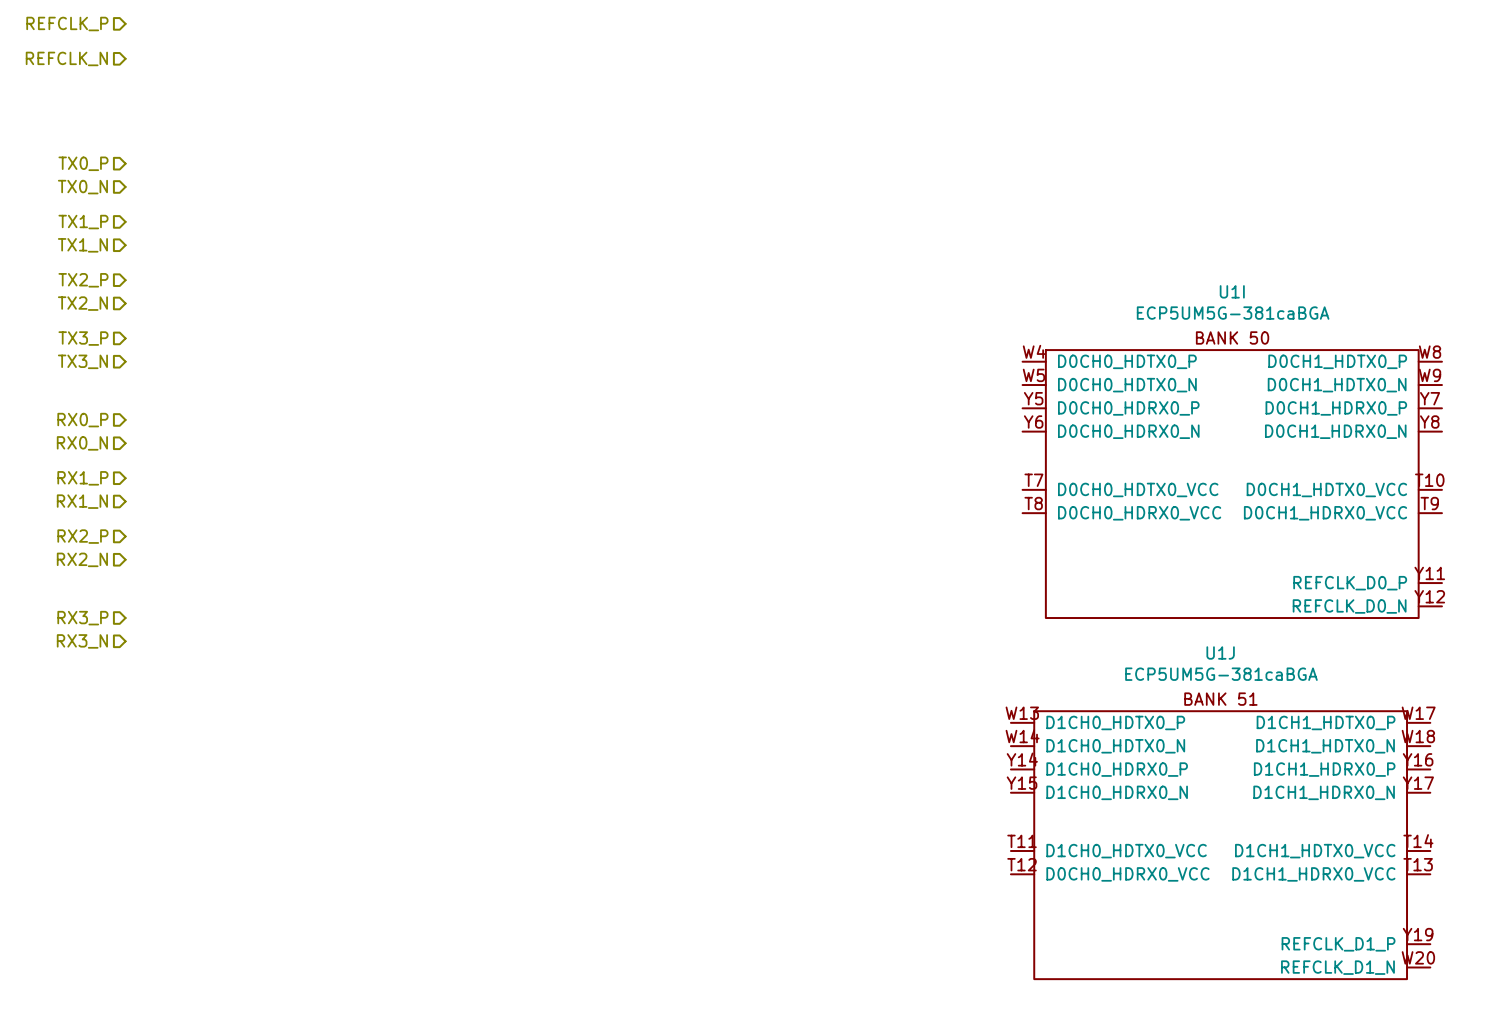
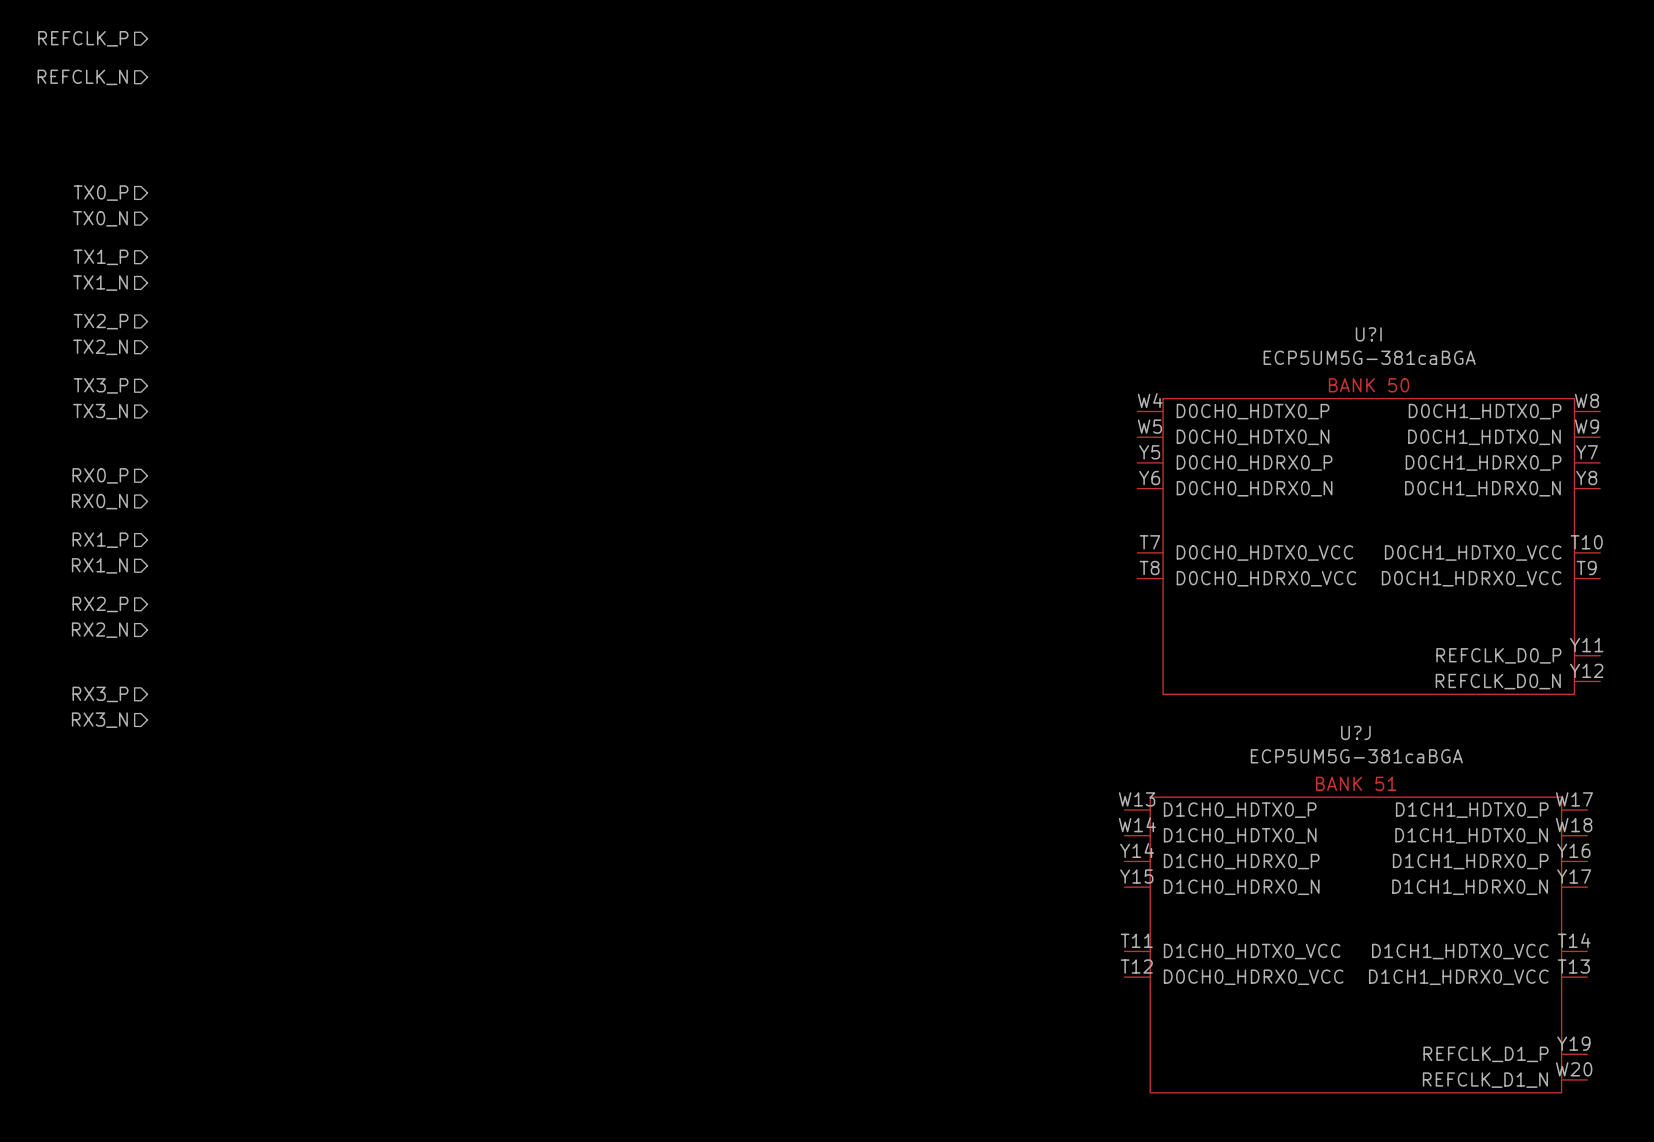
U1I name: U1I (1232, 291) -> U?I (1368, 334)
U1J name: U1J (1220, 652) -> U?J (1355, 732)

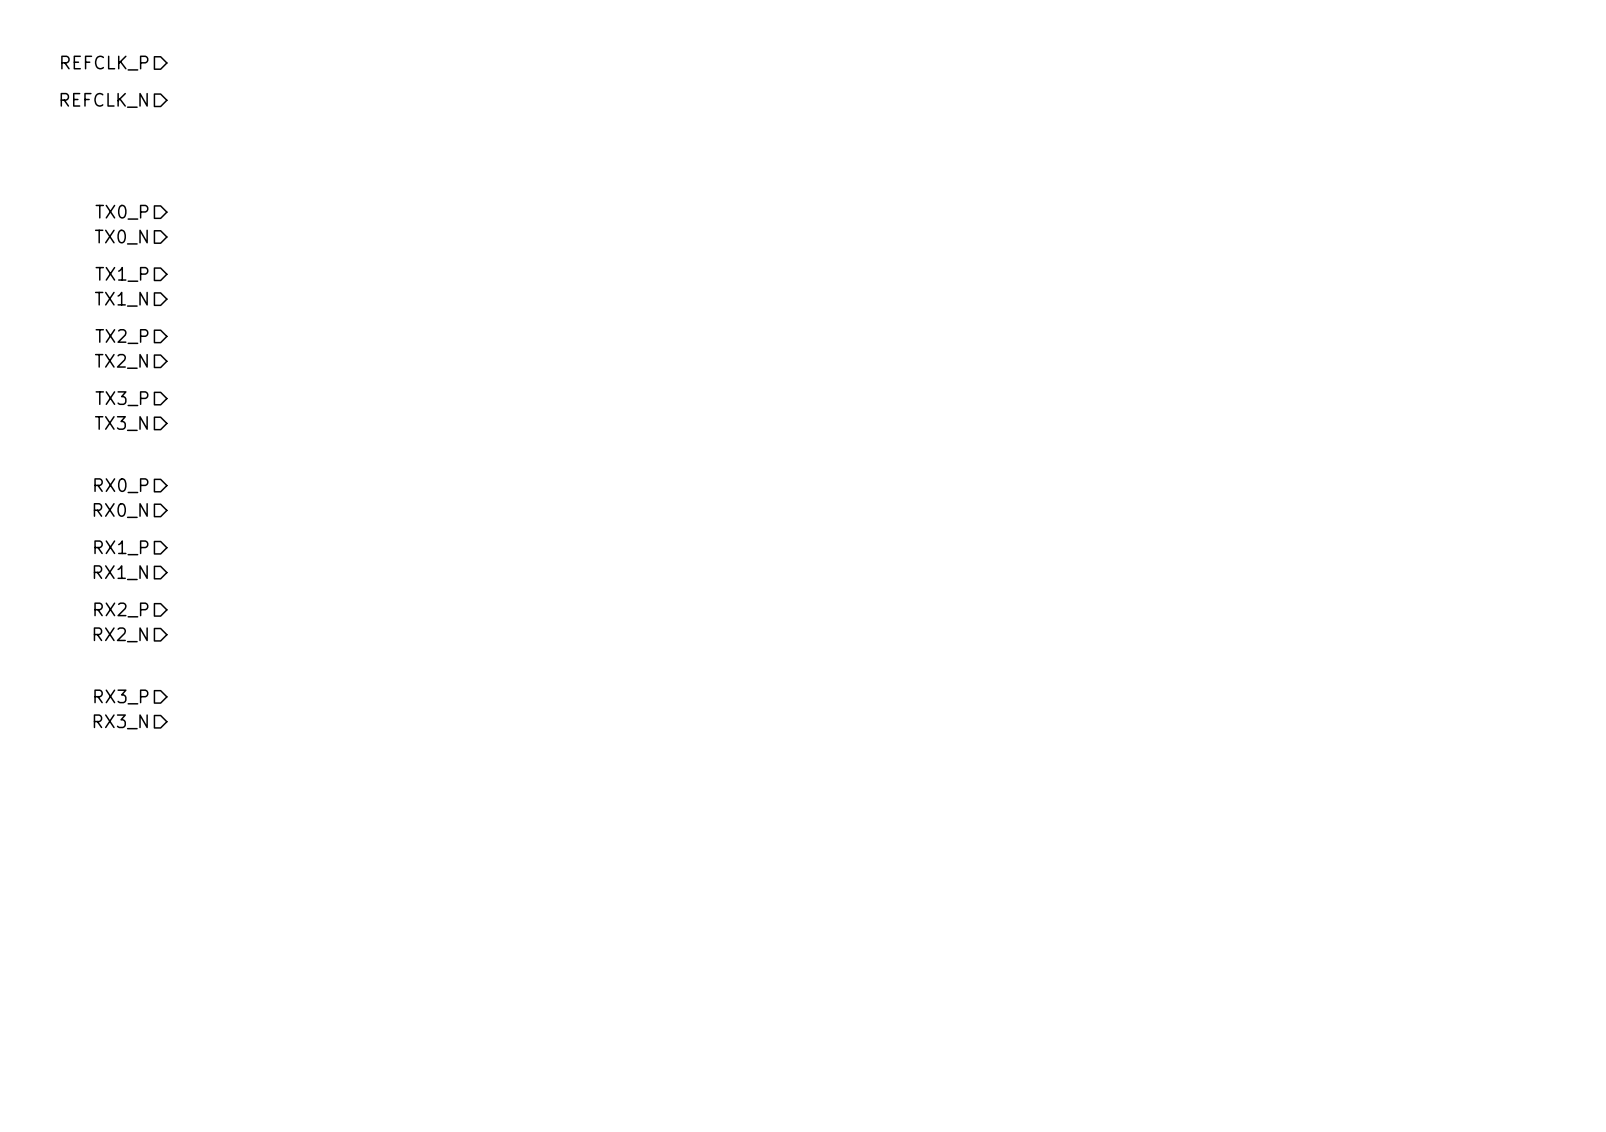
U?I: ECP5UM5G-381caBGA (1368, 546) -> none
U?J: ECP5UM5G-381caBGA (1355, 944) -> none

